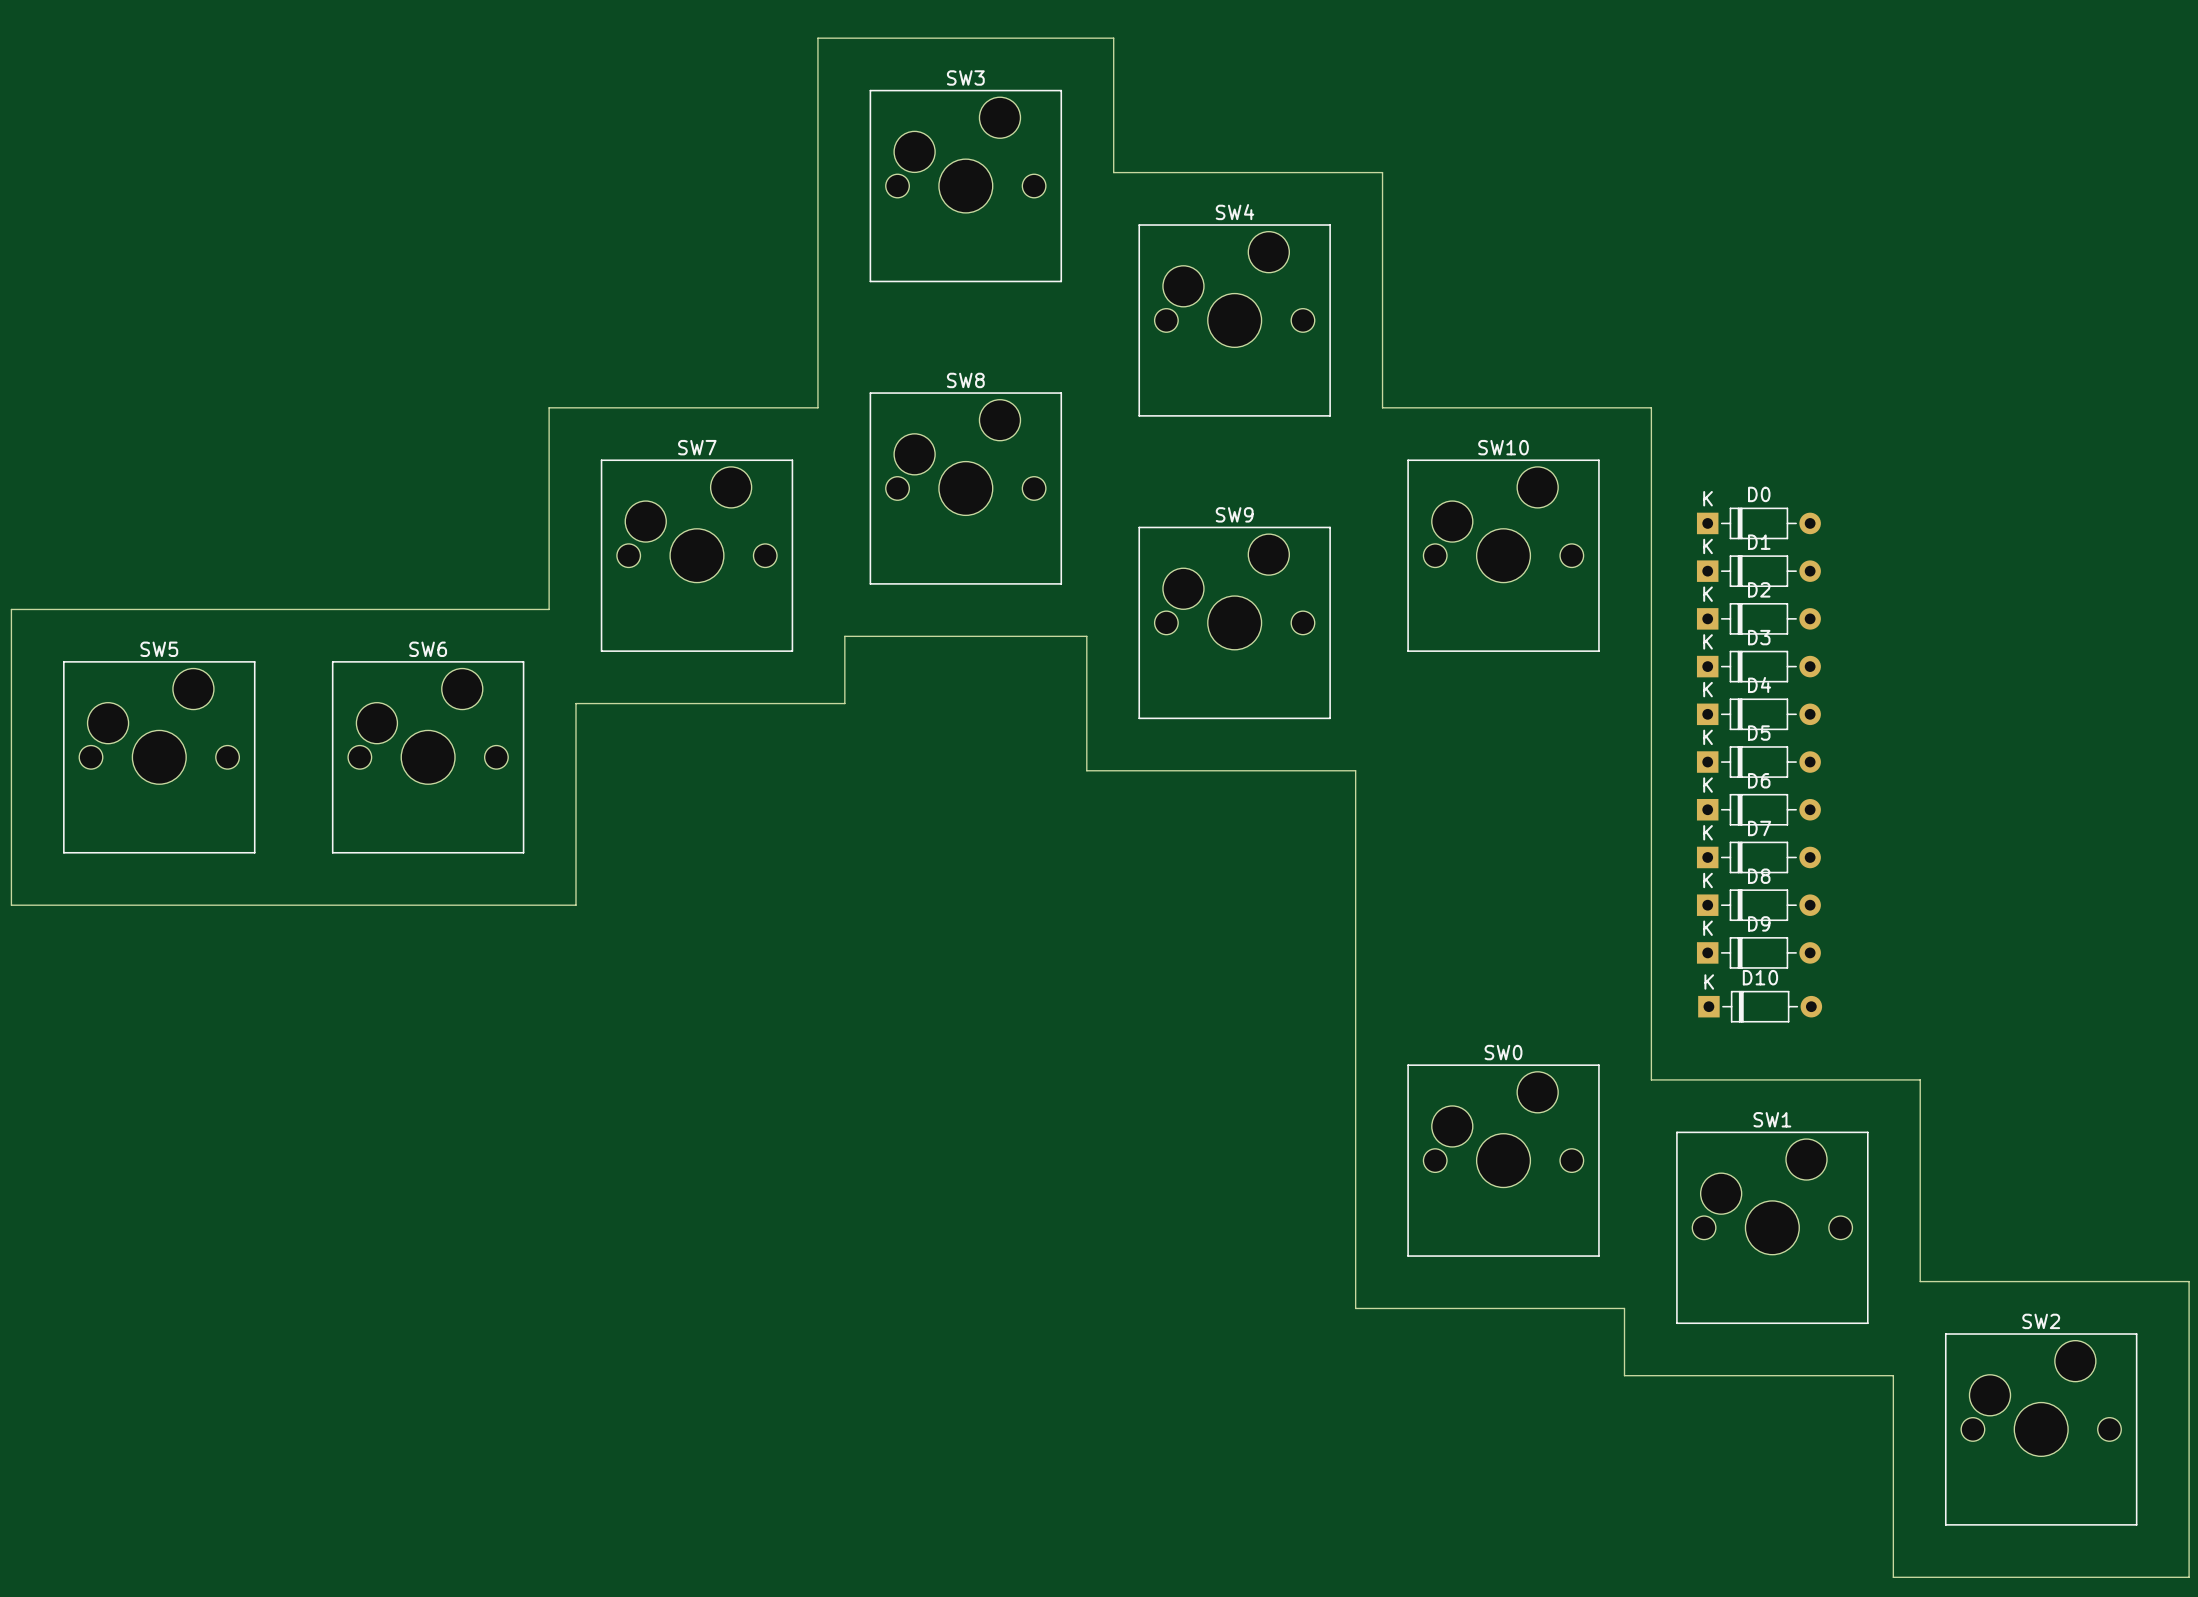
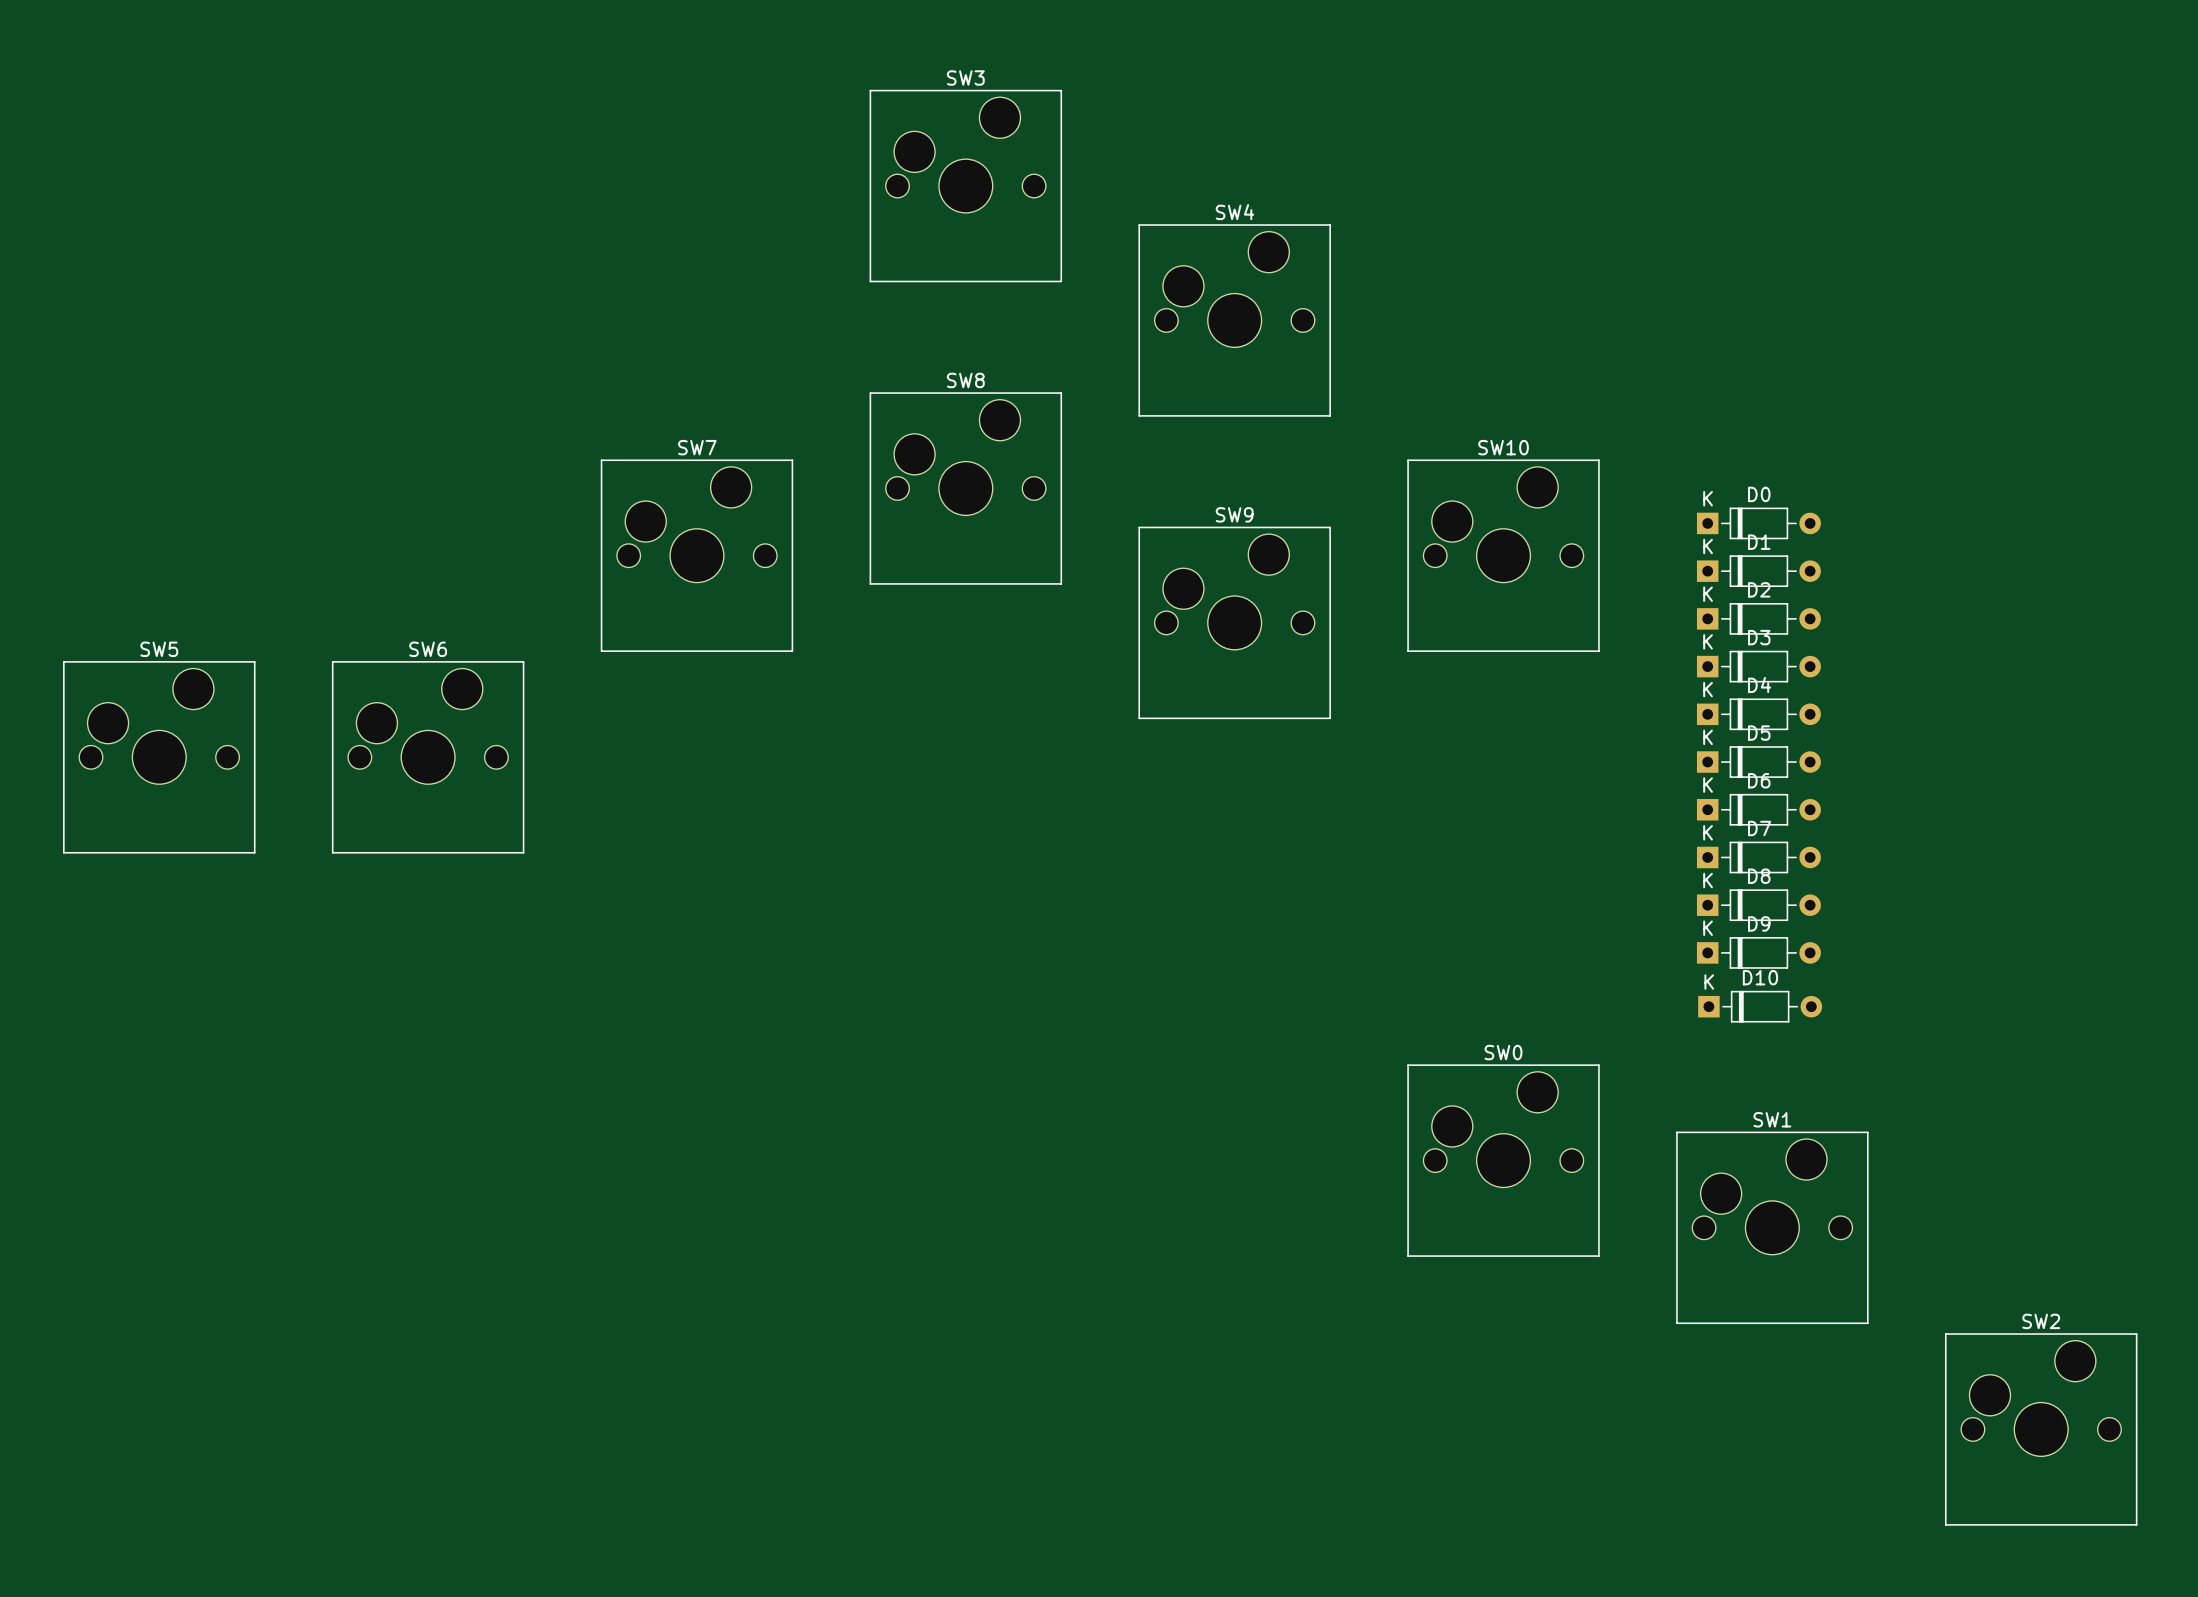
board edge: (817, 38) (817, 407) (549, 407) (549, 609) (11, 609) (11, 905) (576, 905) (576, 703) (844, 703) (844, 636) (1086, 636) (1086, 770) (1355, 770) (1355, 1308) (1624, 1308) (1624, 1375) (1893, 1375) (1893, 1577) (2189, 1577) (2189, 1281) (1920, 1281) (1920, 1079) (1651, 1079) (1651, 407) (1382, 407) (1382, 172) (1113, 172) (1113, 38) (817, 38) -> none

